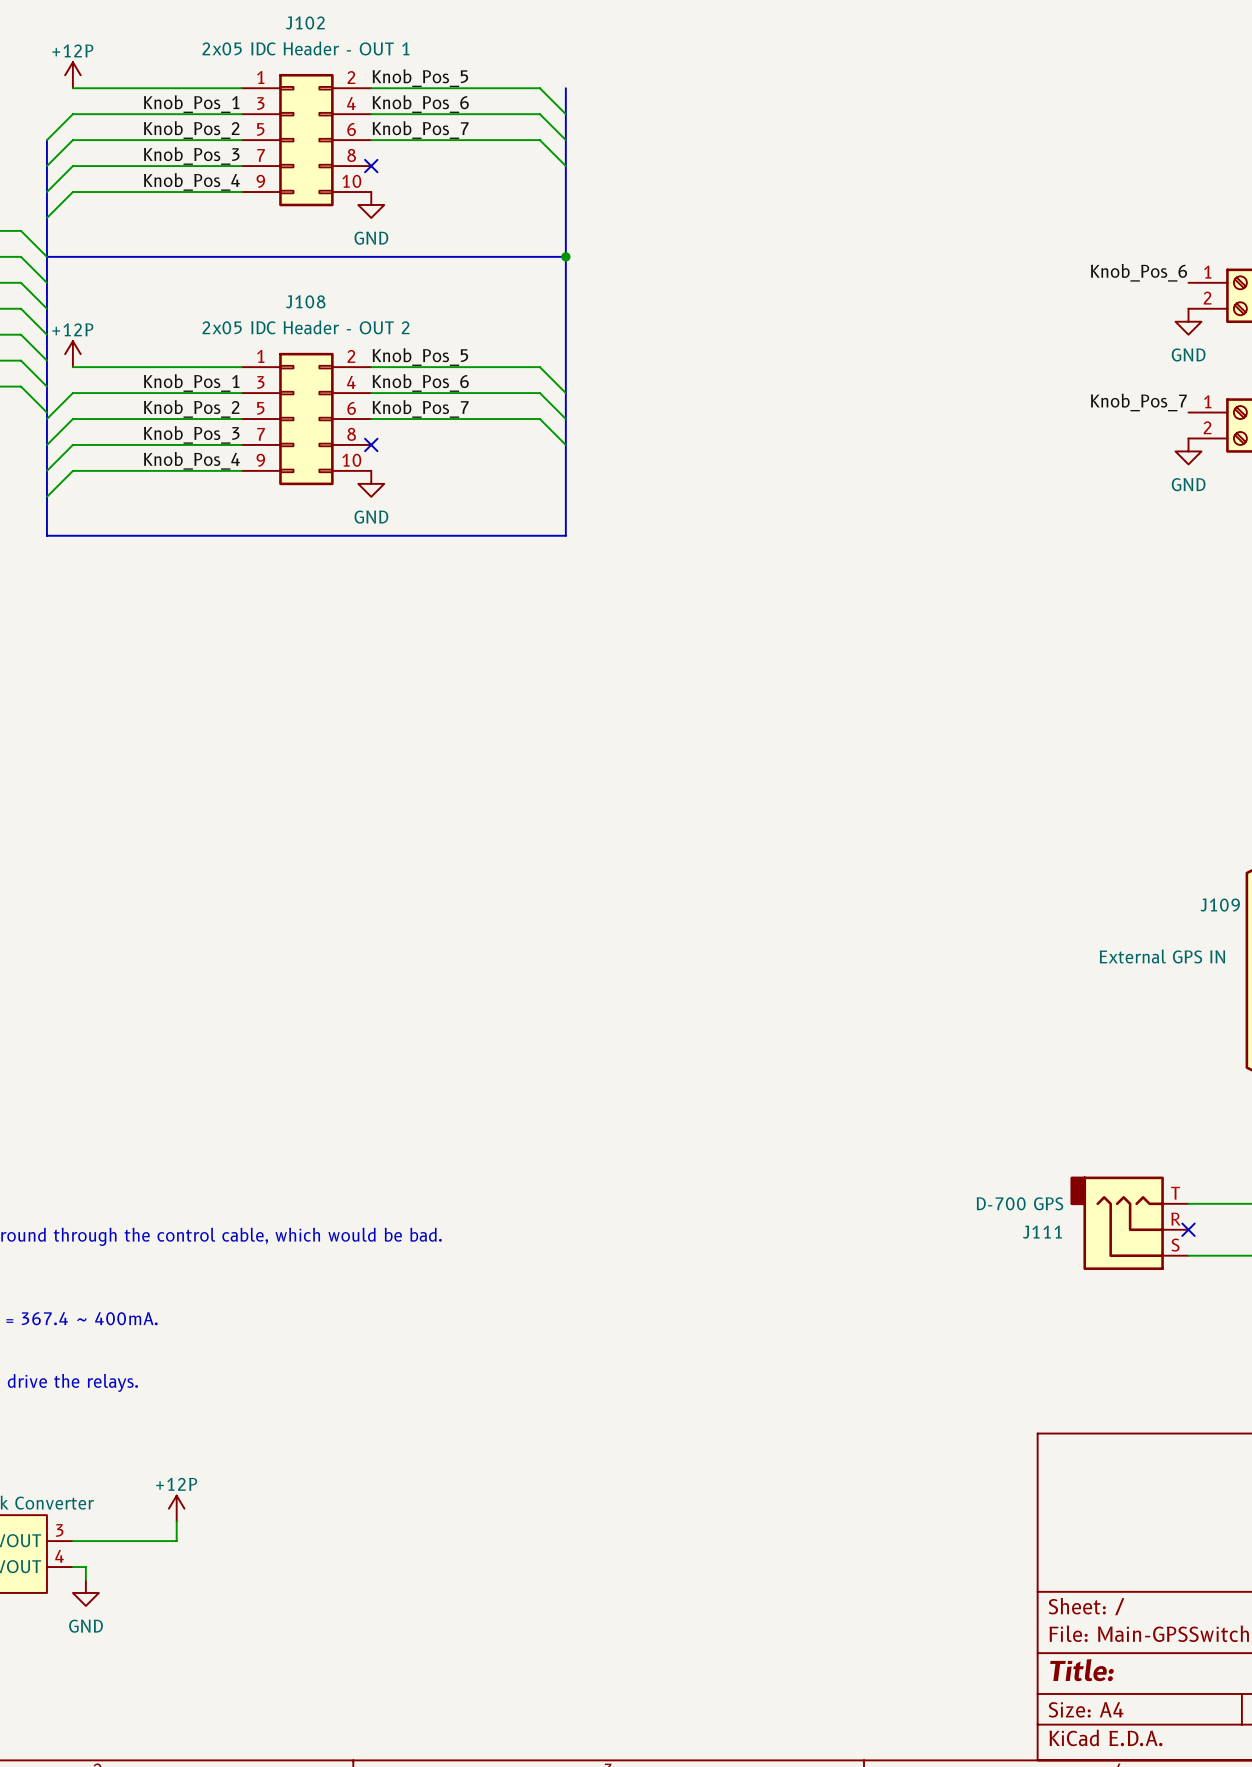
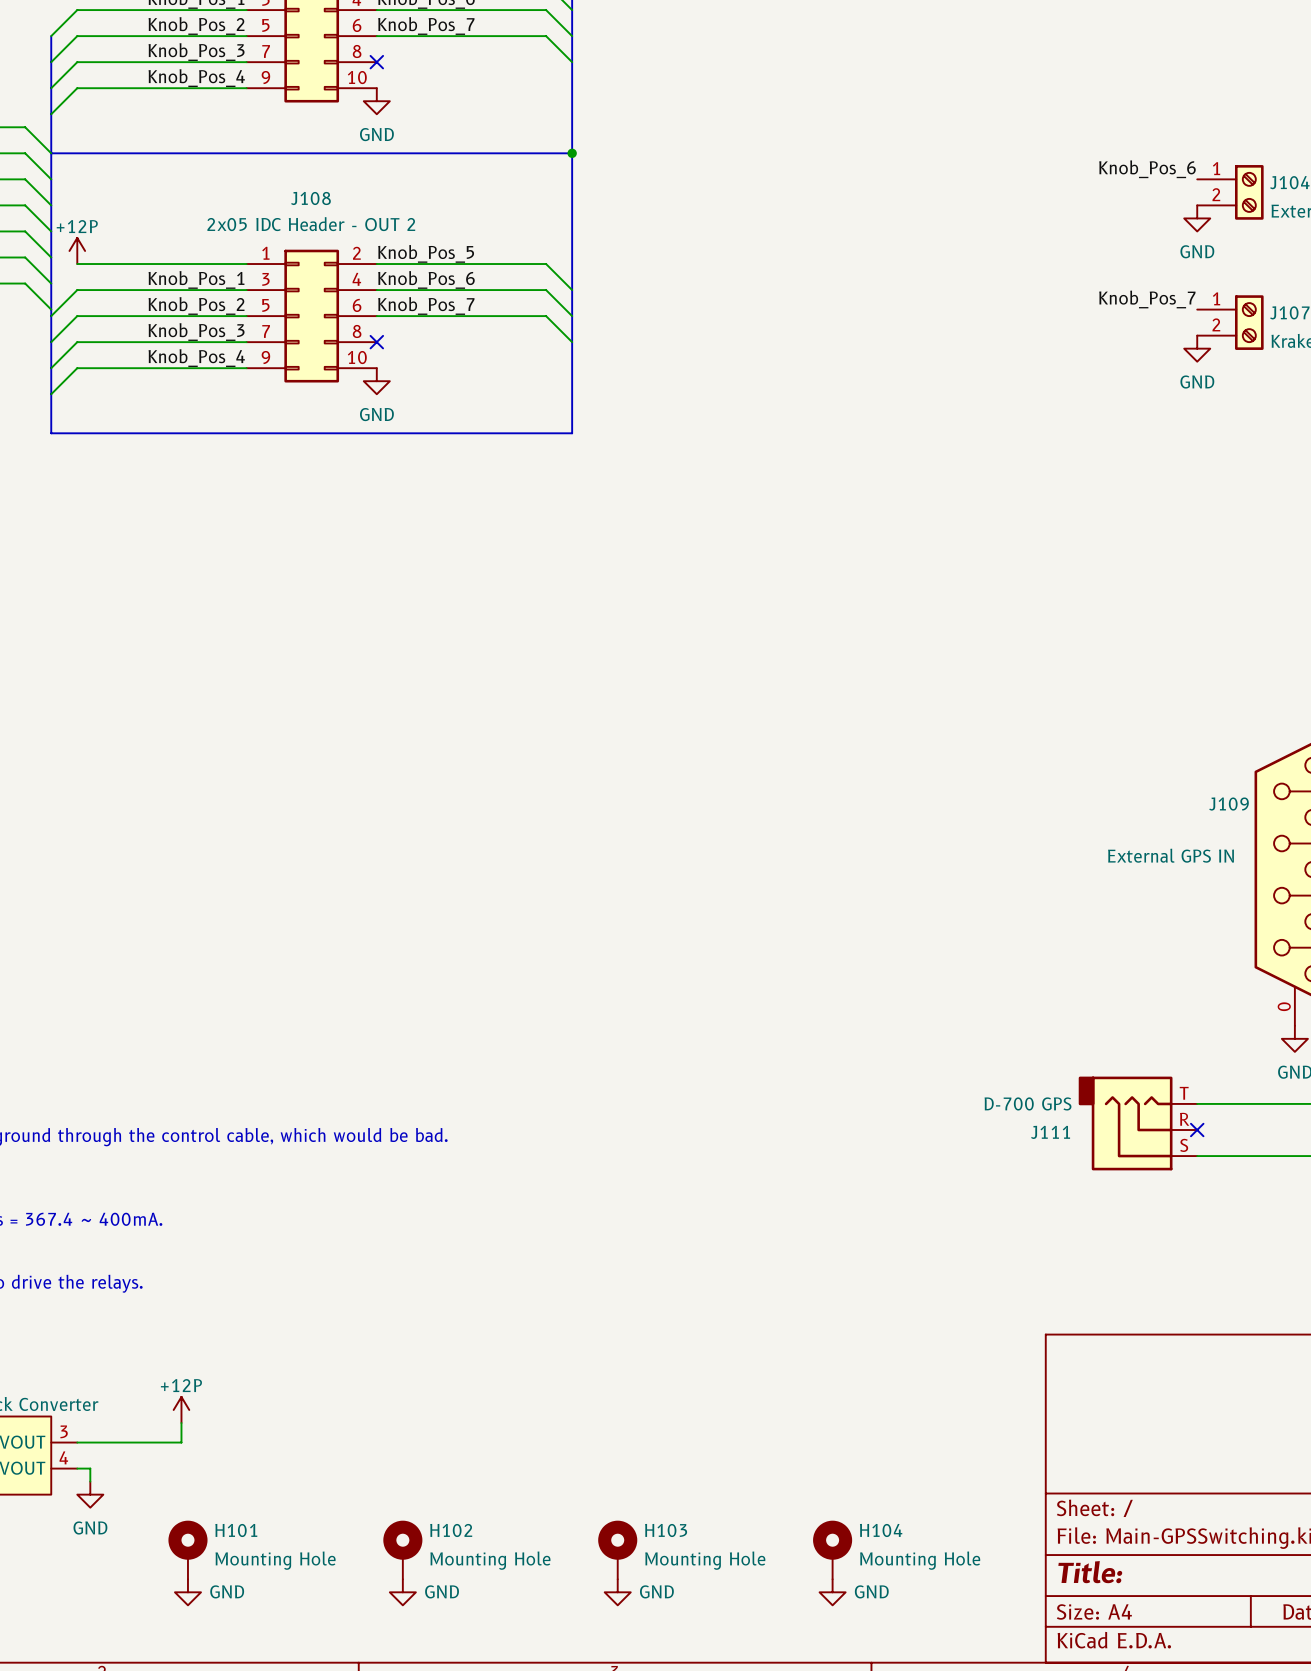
H101: none -> Mounting Hole (187, 1549)
H102: none -> Mounting Hole (402, 1549)
H103: none -> Mounting Hole (617, 1549)
H104: none -> Mounting Hole (832, 1549)
power symbol: none -> GND (187, 1592)
power symbol: none -> GND (402, 1592)
power symbol: none -> GND (617, 1592)
power symbol: none -> GND (832, 1592)

